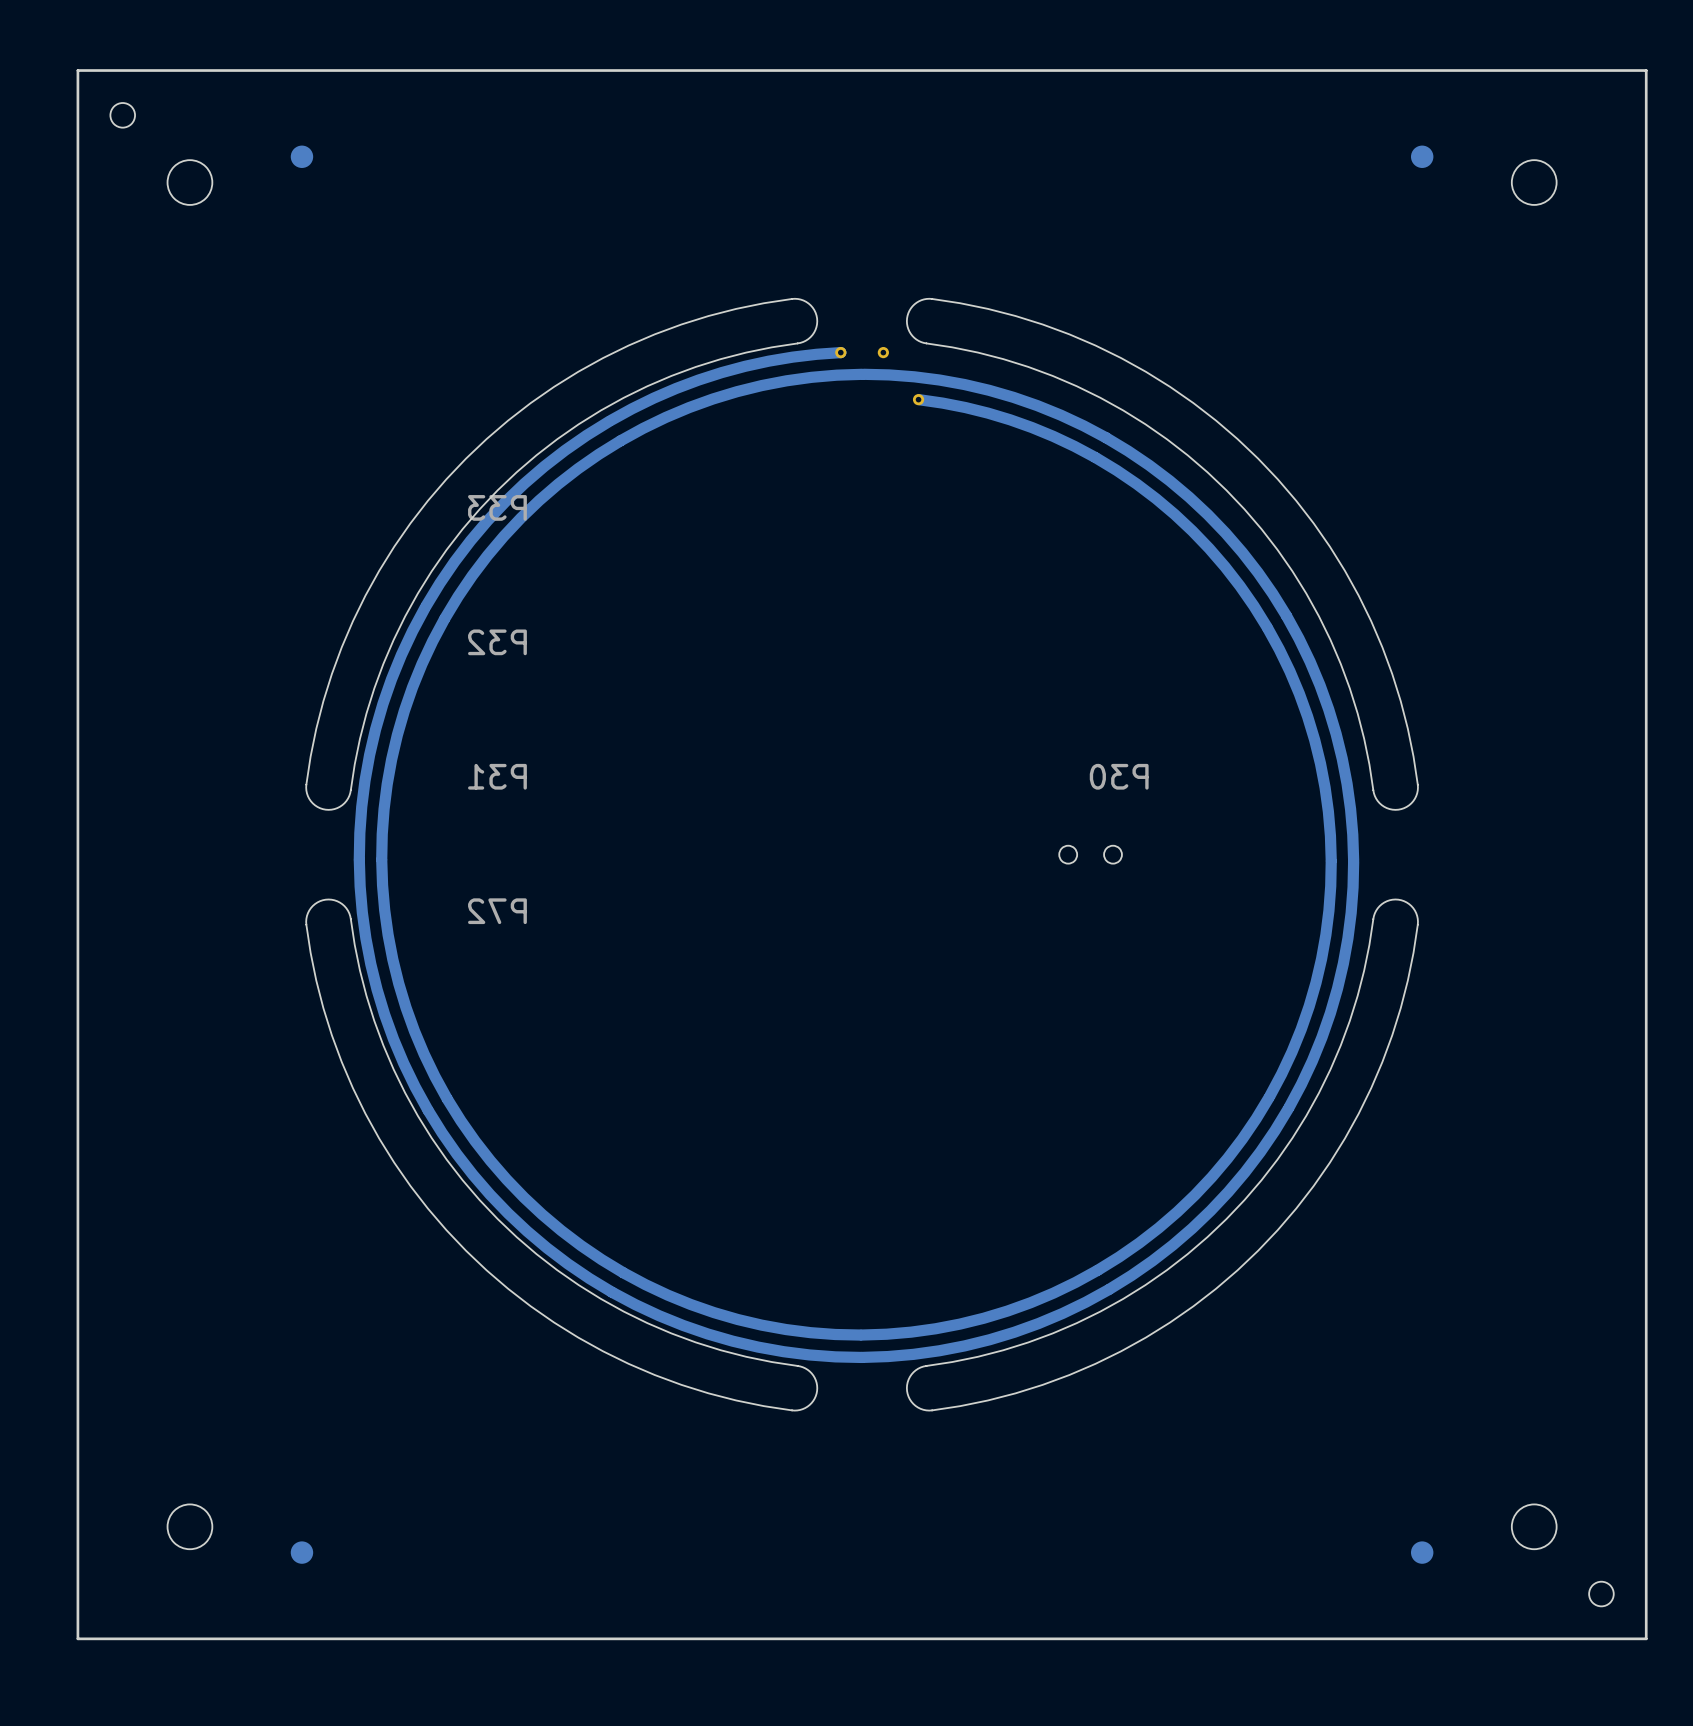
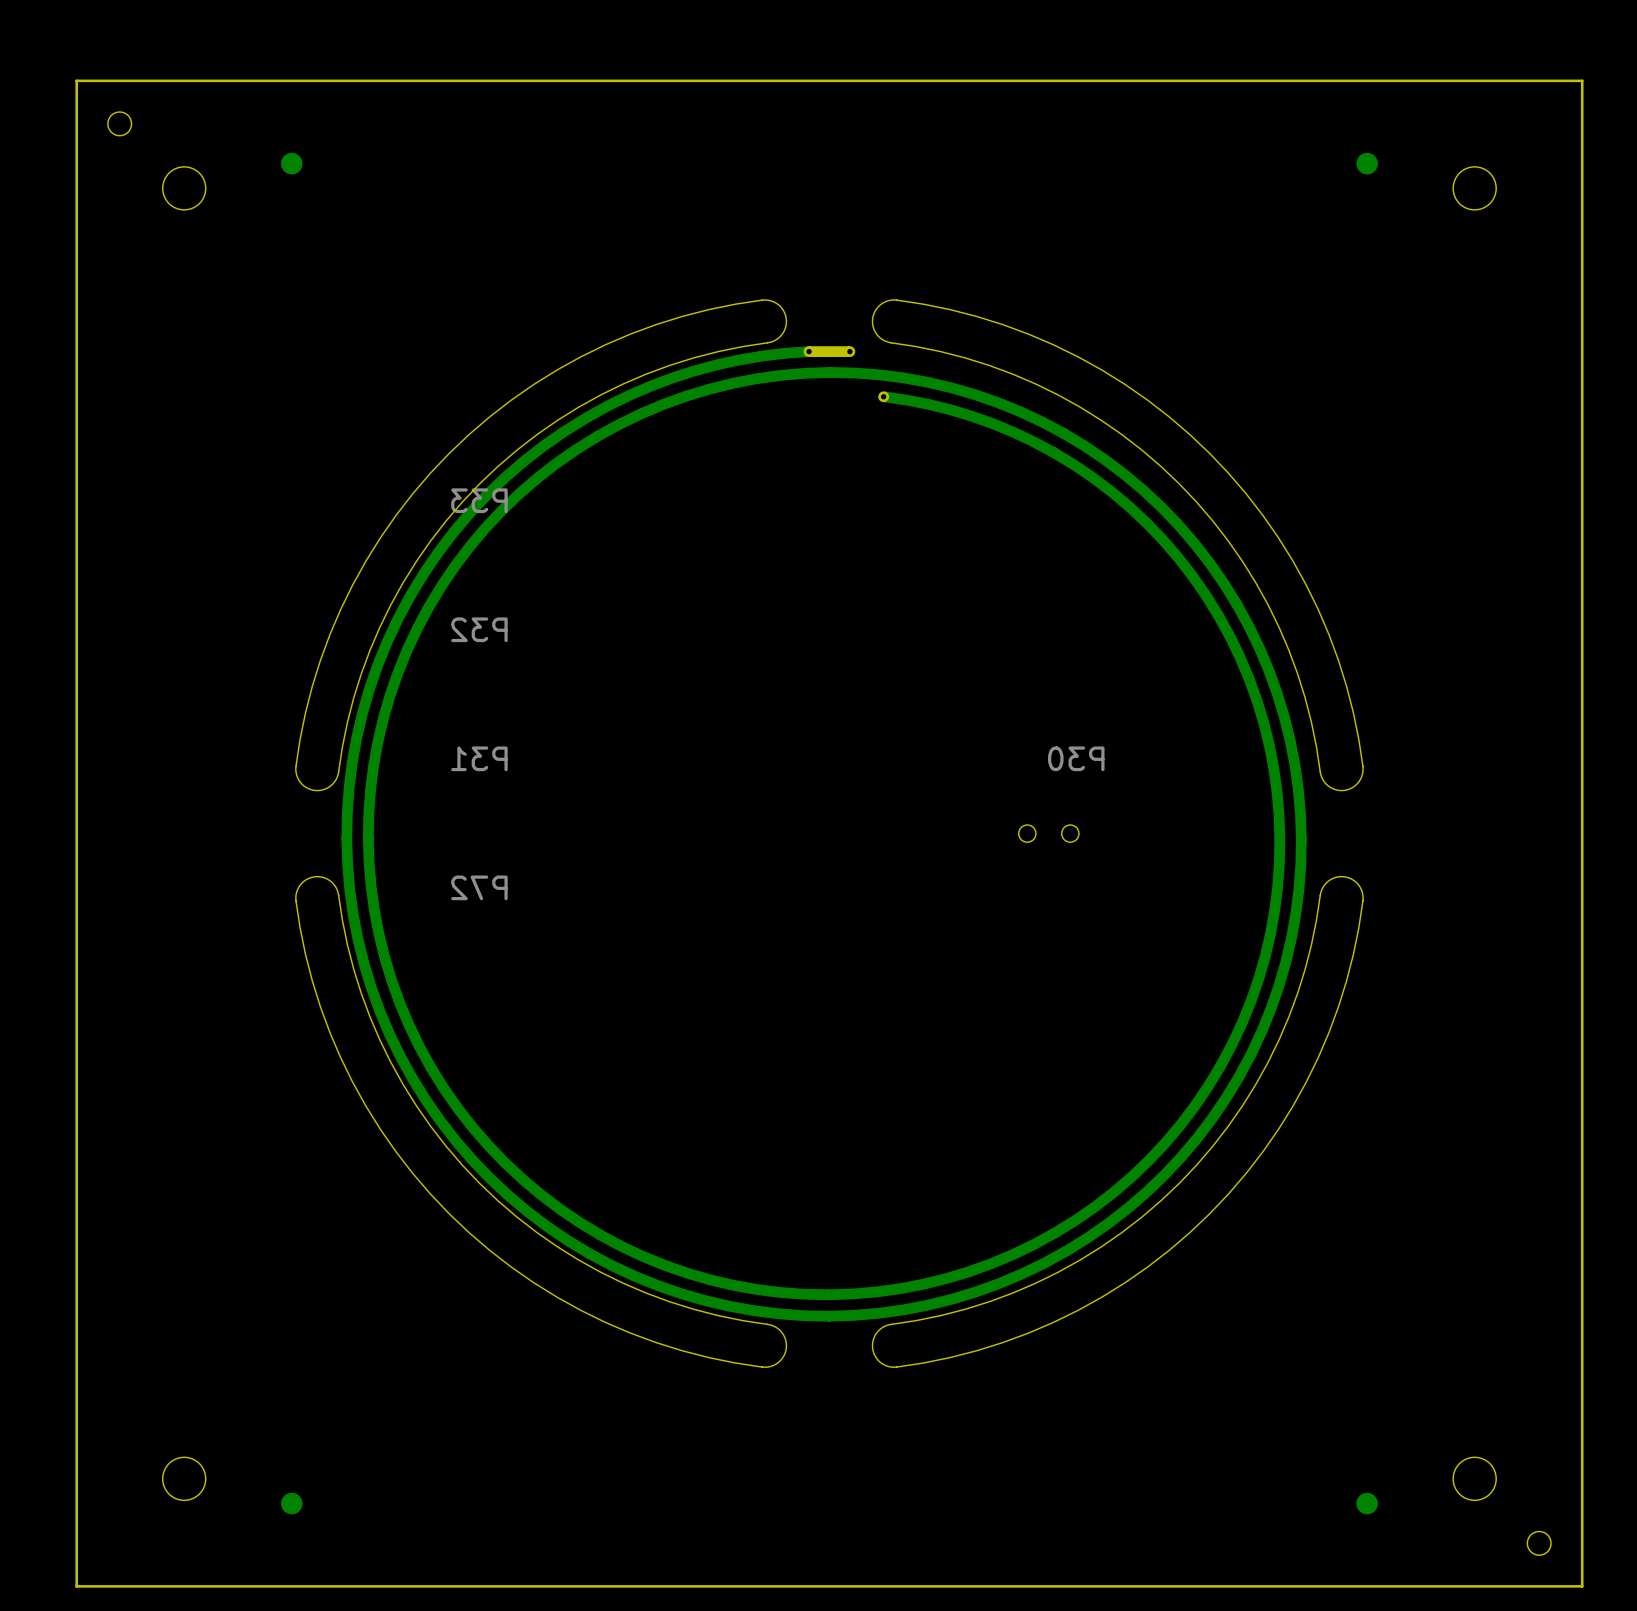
part footprint: [353, 346, 1360, 1364] -> [341, 346, 1307, 1322]

